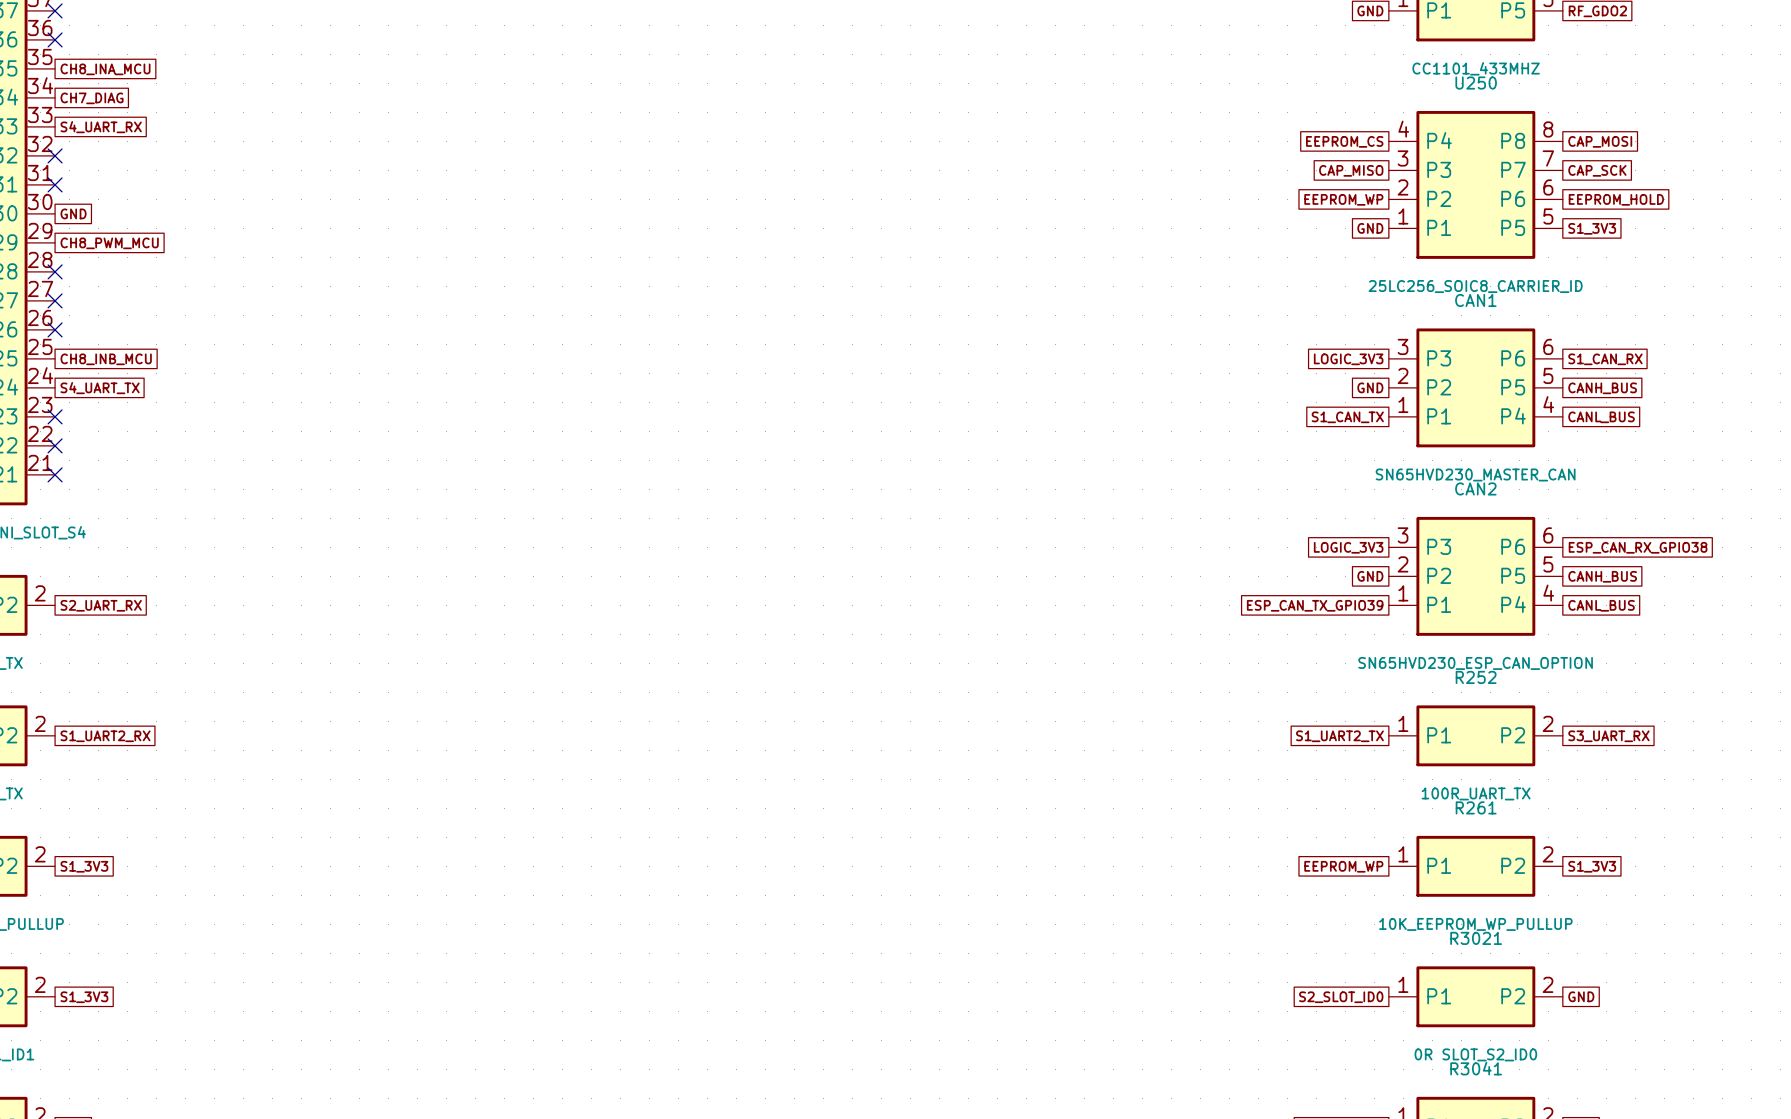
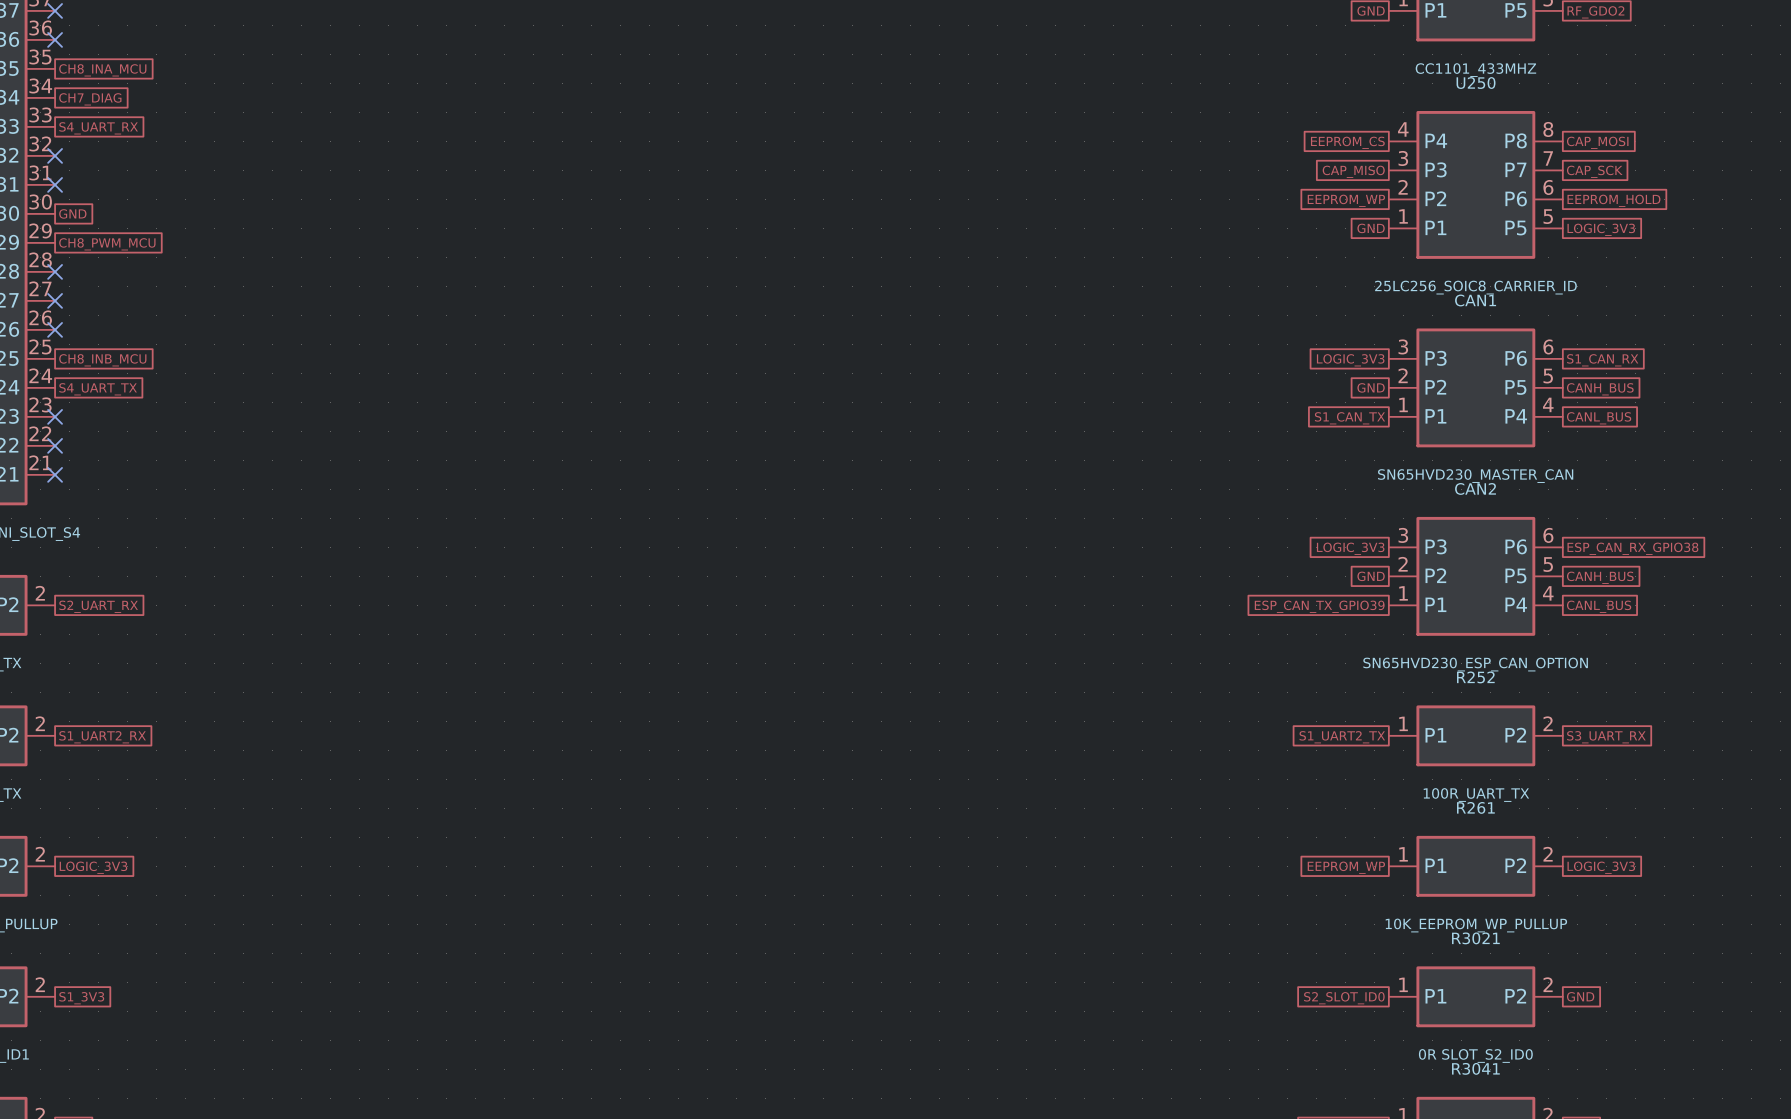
global label: S1_3V3 (1592, 228) -> LOGIC_3V3 (1601, 229)
global label: S1_3V3 (84, 866) -> LOGIC_3V3 (93, 867)
global label: S1_3V3 (1592, 866) -> LOGIC_3V3 (1601, 867)

